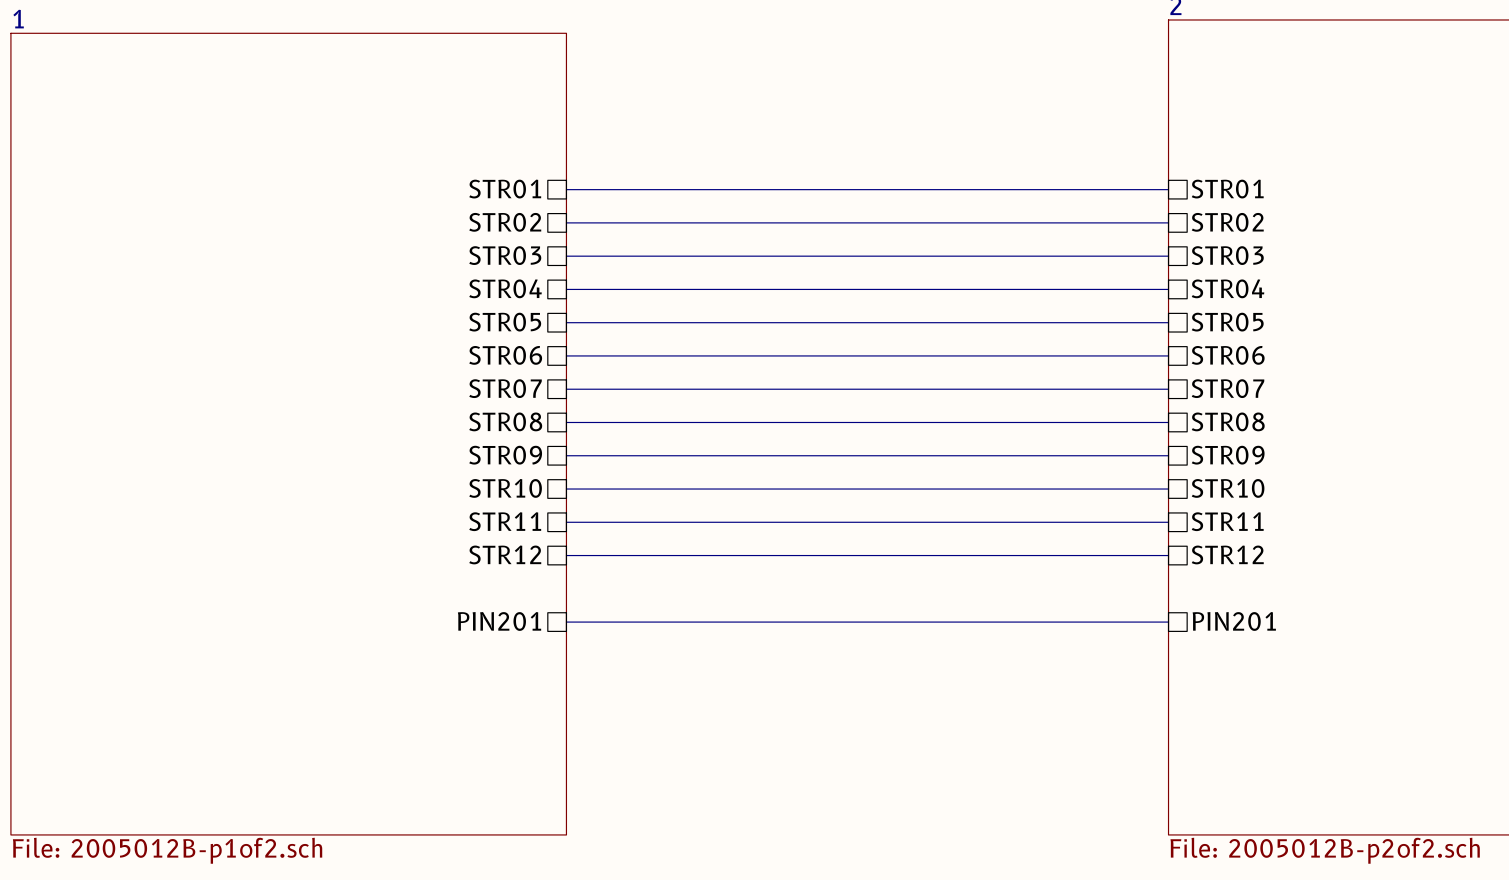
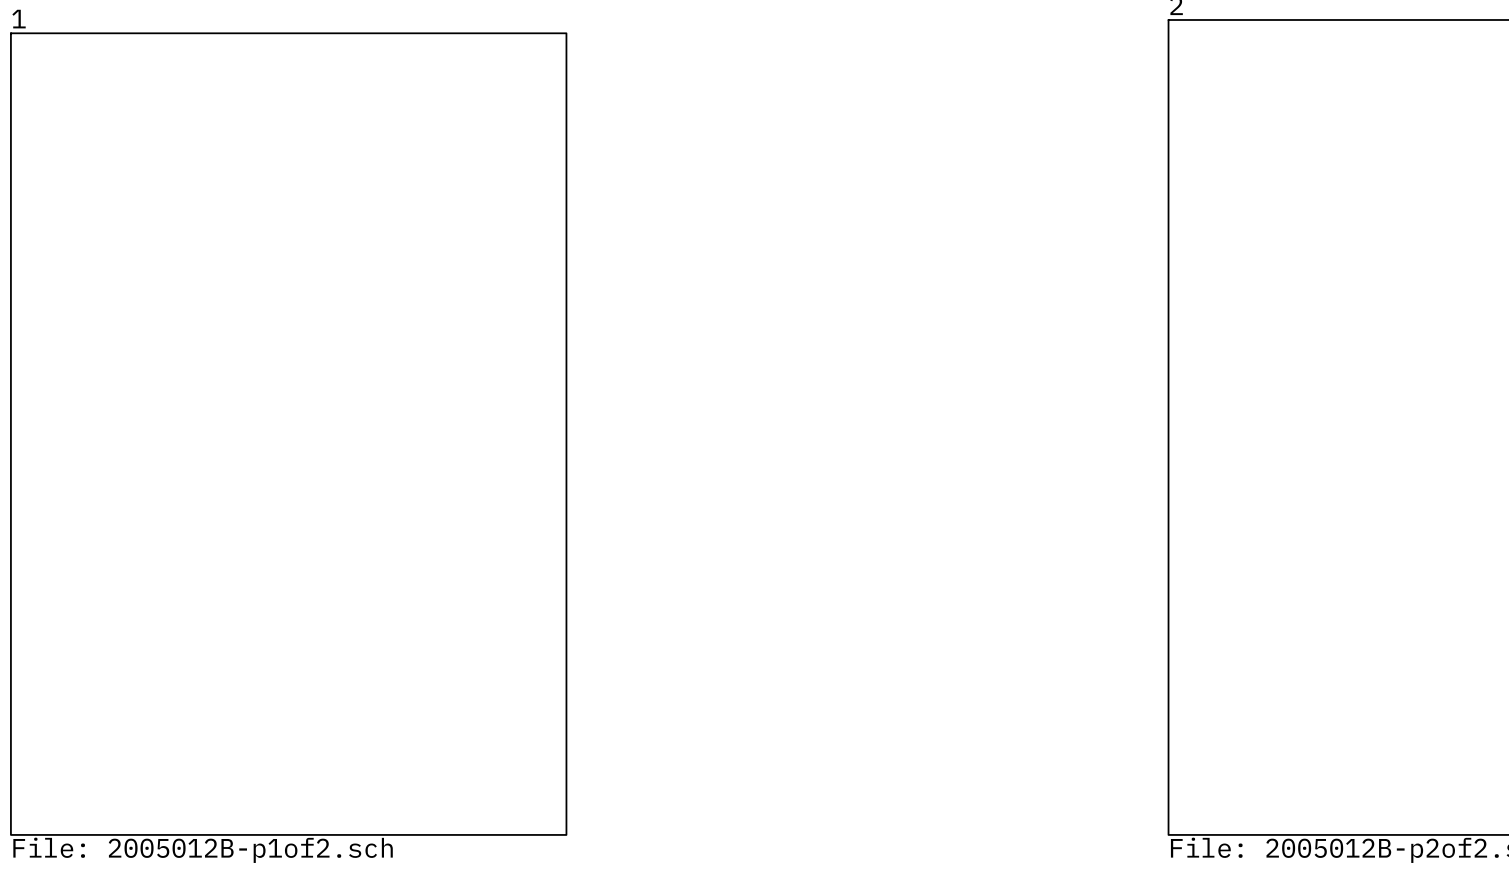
sheet pin: STR01 (505, 189) -> none
wire: (566, 189) (1168, 189) -> none
sheet pin: STR01 (1227, 189) -> none
sheet pin: STR02 (505, 222) -> none
wire: (566, 222) (1168, 222) -> none
sheet pin: STR02 (1227, 222) -> none
sheet pin: STR03 (505, 255) -> none
sheet pin: STR03 (1227, 255) -> none
wire: (566, 256) (1168, 256) -> none
sheet pin: STR04 (505, 288) -> none
sheet pin: STR04 (1228, 288) -> none
wire: (566, 289) (1168, 289) -> none
sheet pin: STR05 (505, 322) -> none
wire: (566, 322) (1168, 322) -> none
sheet pin: STR05 (1227, 322) -> none
sheet pin: STR06 (505, 355) -> none
wire: (566, 355) (1168, 355) -> none
sheet pin: STR06 (1228, 355) -> none
sheet pin: STR07 (505, 388) -> none
sheet pin: STR07 (1228, 388) -> none
wire: (566, 389) (1168, 389) -> none
sheet pin: STR08 (505, 421) -> none
sheet pin: STR08 (1228, 421) -> none
wire: (566, 422) (1168, 422) -> none
sheet pin: STR09 (505, 455) -> none
wire: (566, 455) (1168, 455) -> none
sheet pin: STR09 (1228, 455) -> none
sheet pin: STR10 (505, 488) -> none
sheet pin: STR10 (1228, 488) -> none
wire: (566, 489) (1168, 489) -> none
sheet pin: STR11 (505, 521) -> none
sheet pin: STR11 (1227, 521) -> none
wire: (566, 522) (1168, 522) -> none
sheet pin: STR12 (505, 554) -> none
sheet pin: STR12 (1227, 554) -> none
wire: (566, 555) (1168, 555) -> none
sheet pin: PIN201 (499, 621) -> none
sheet pin: PIN201 (1234, 621) -> none
wire: (566, 622) (1168, 622) -> none

